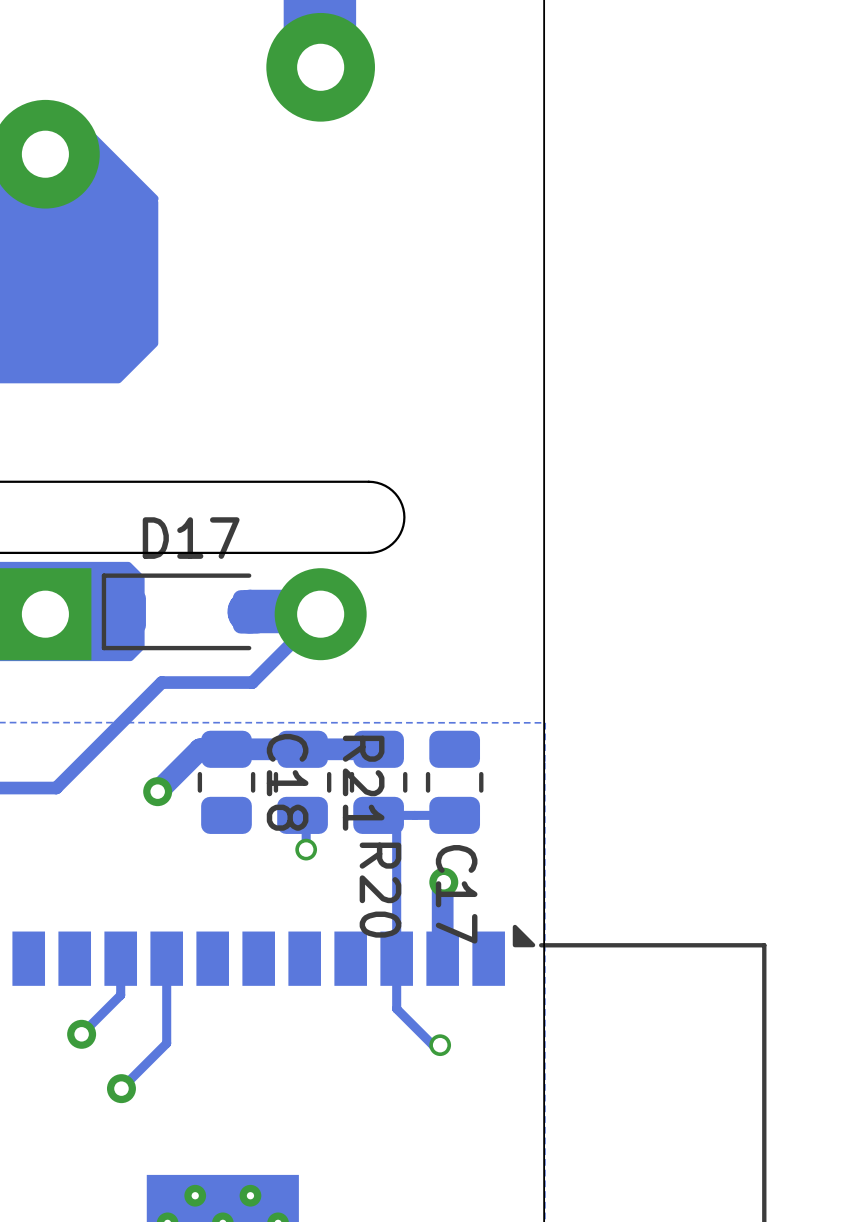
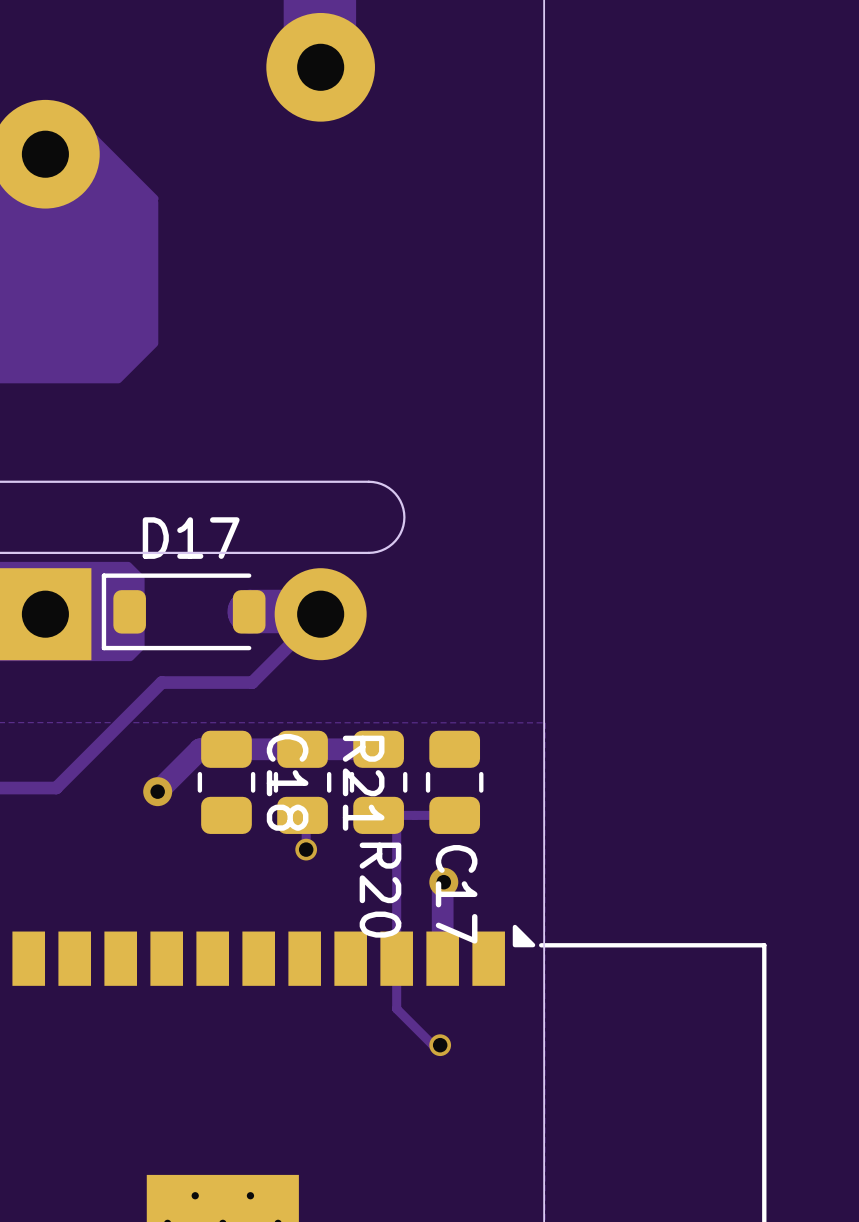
track: (120, 958) (120, 995) (81, 1034) -> none
track: (166, 958) (166, 1043) (121, 1088) -> none
via: (81, 1034) -> none
via: (121, 1088) -> none

